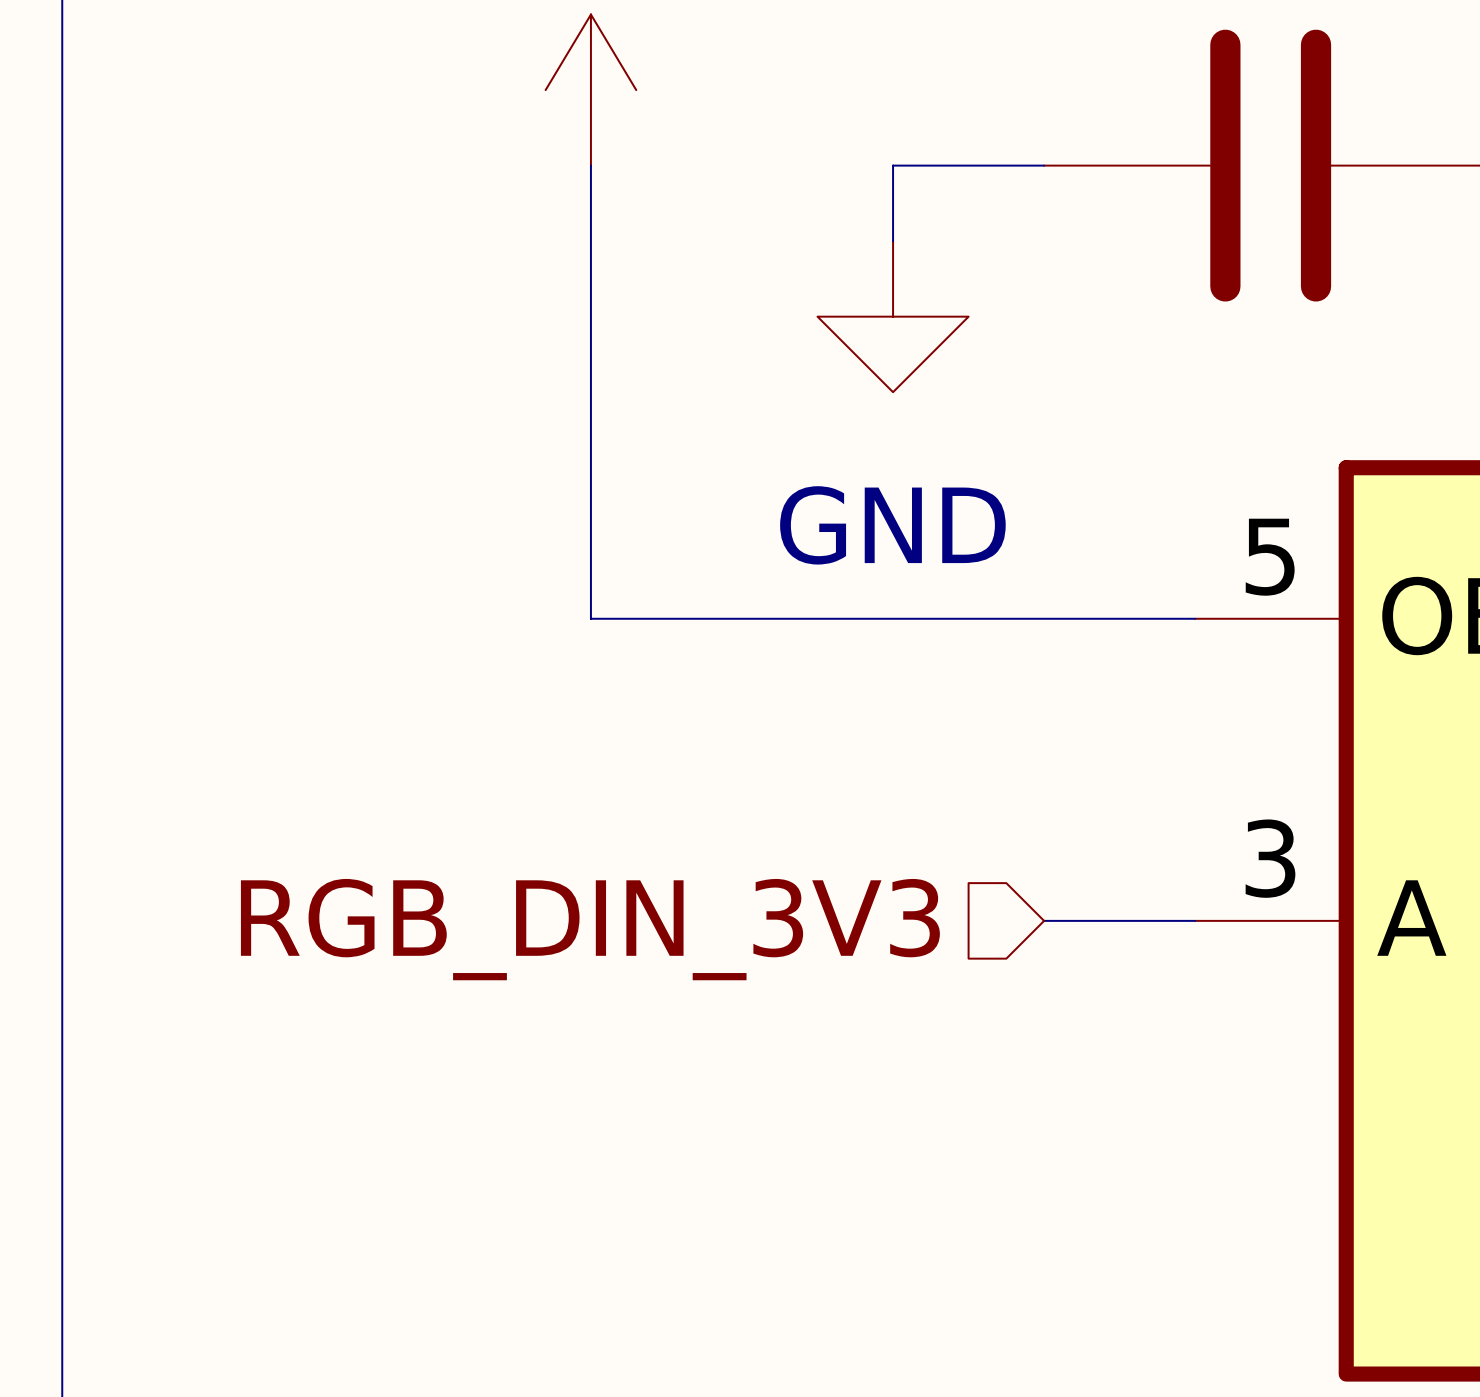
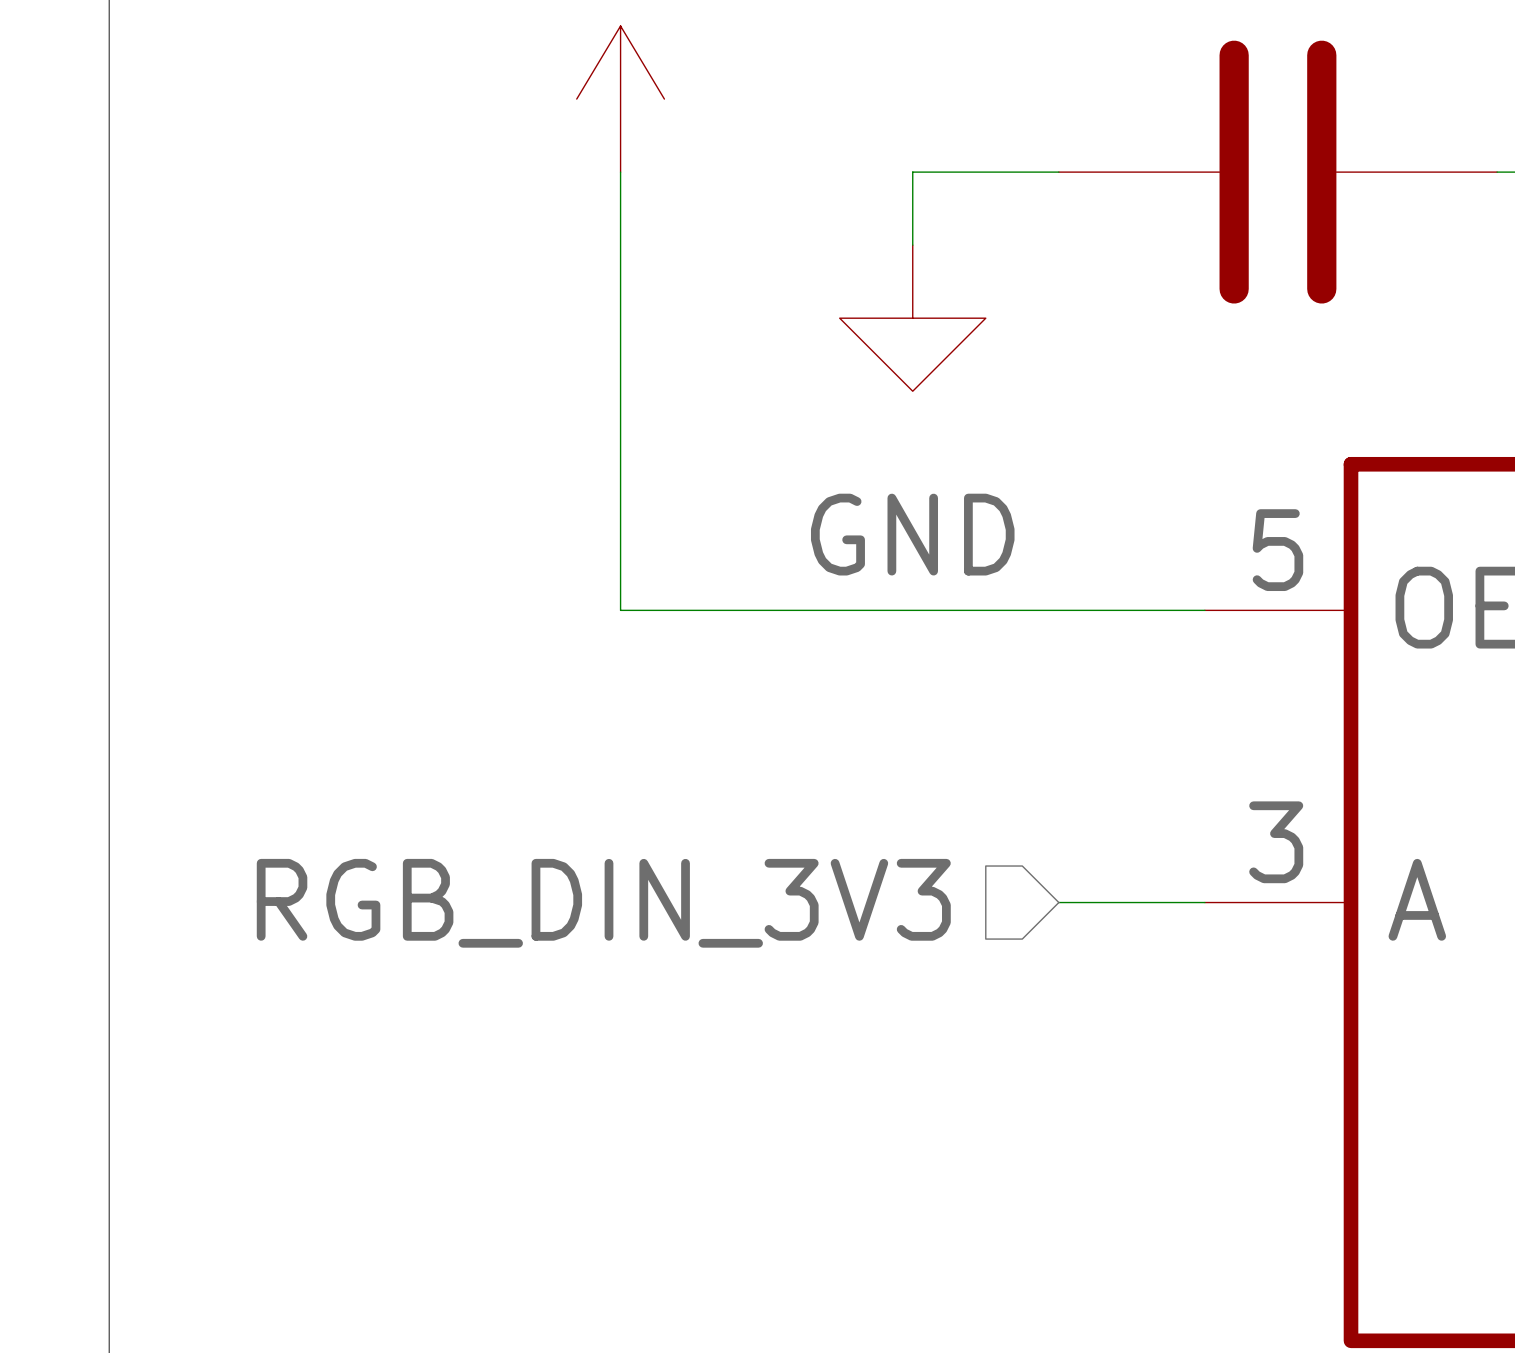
power symbol text position: GND (892, 525) -> GND (912, 534)

